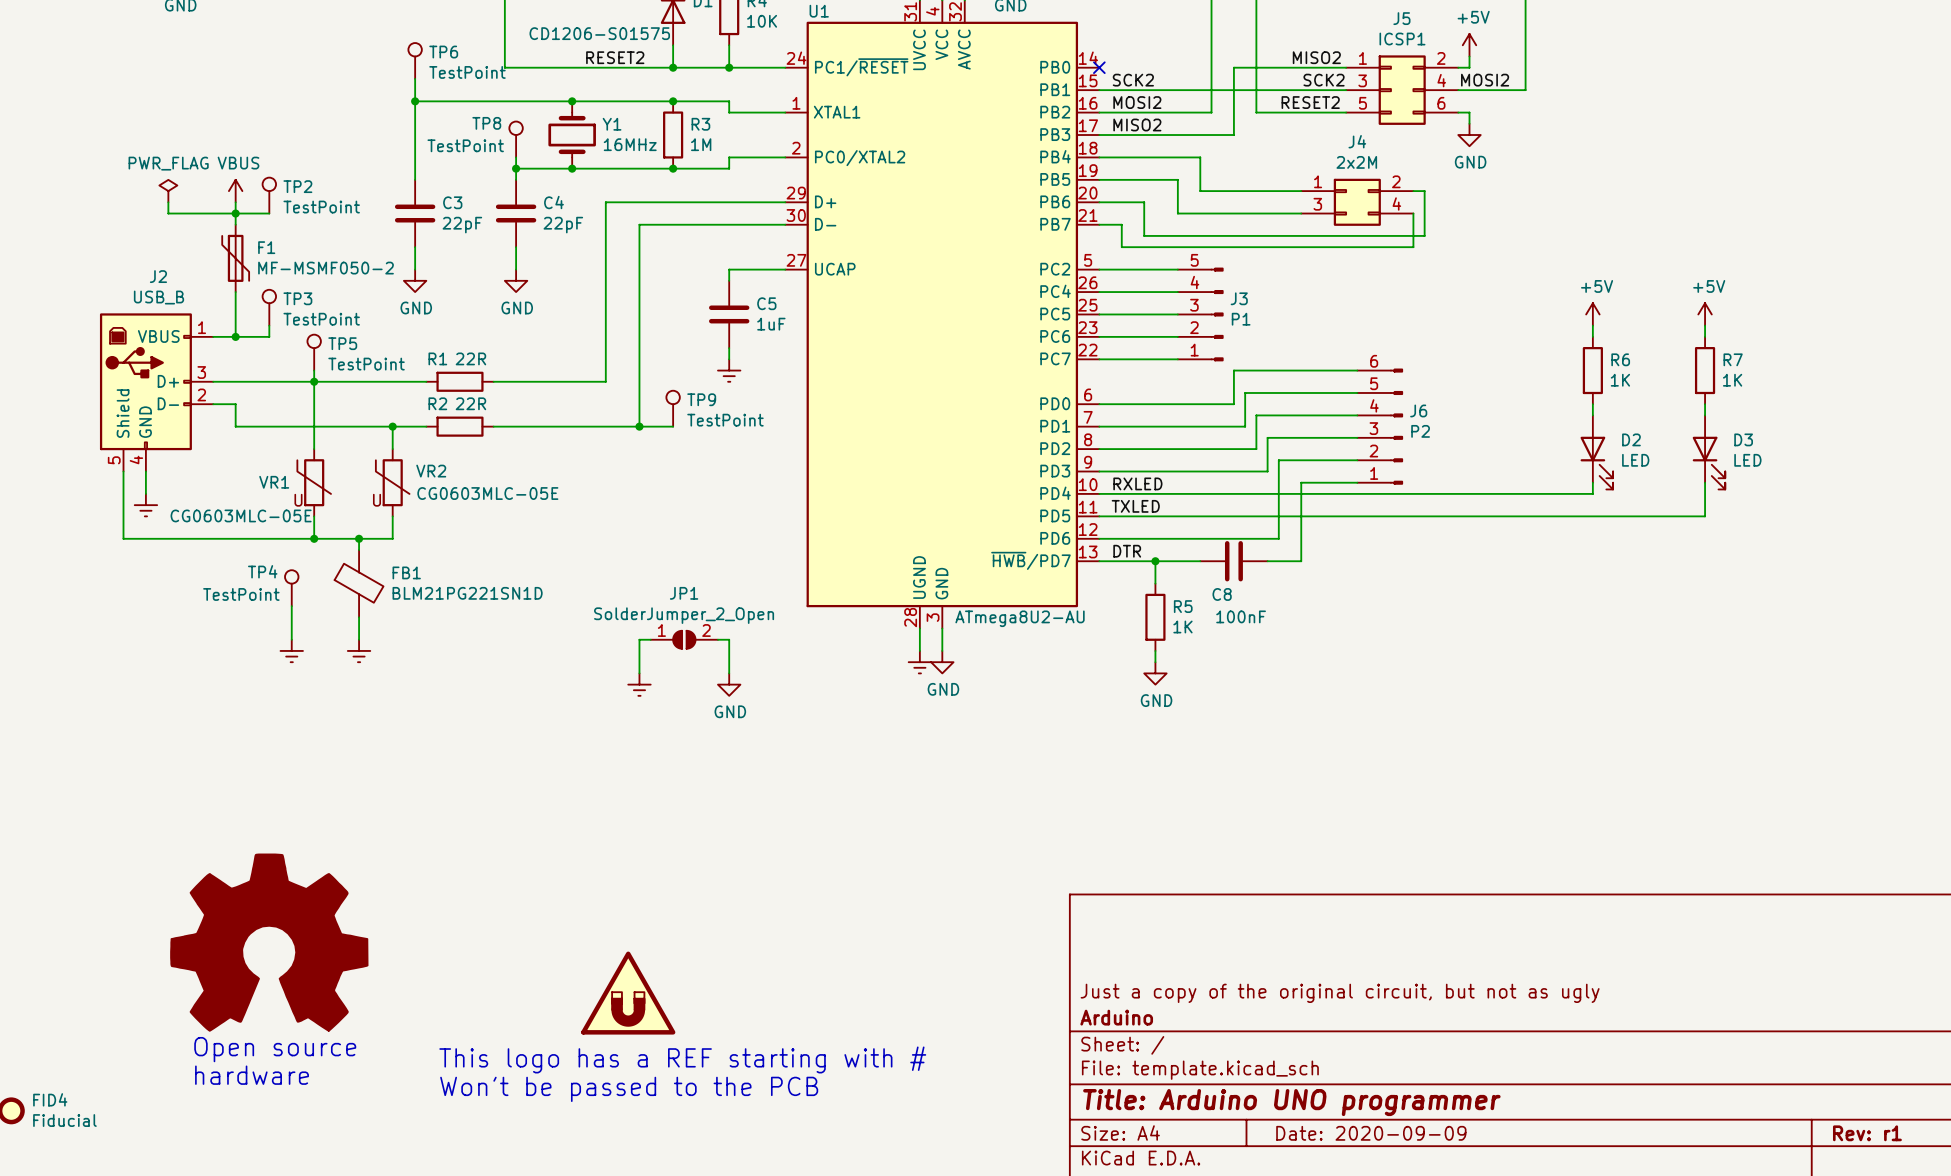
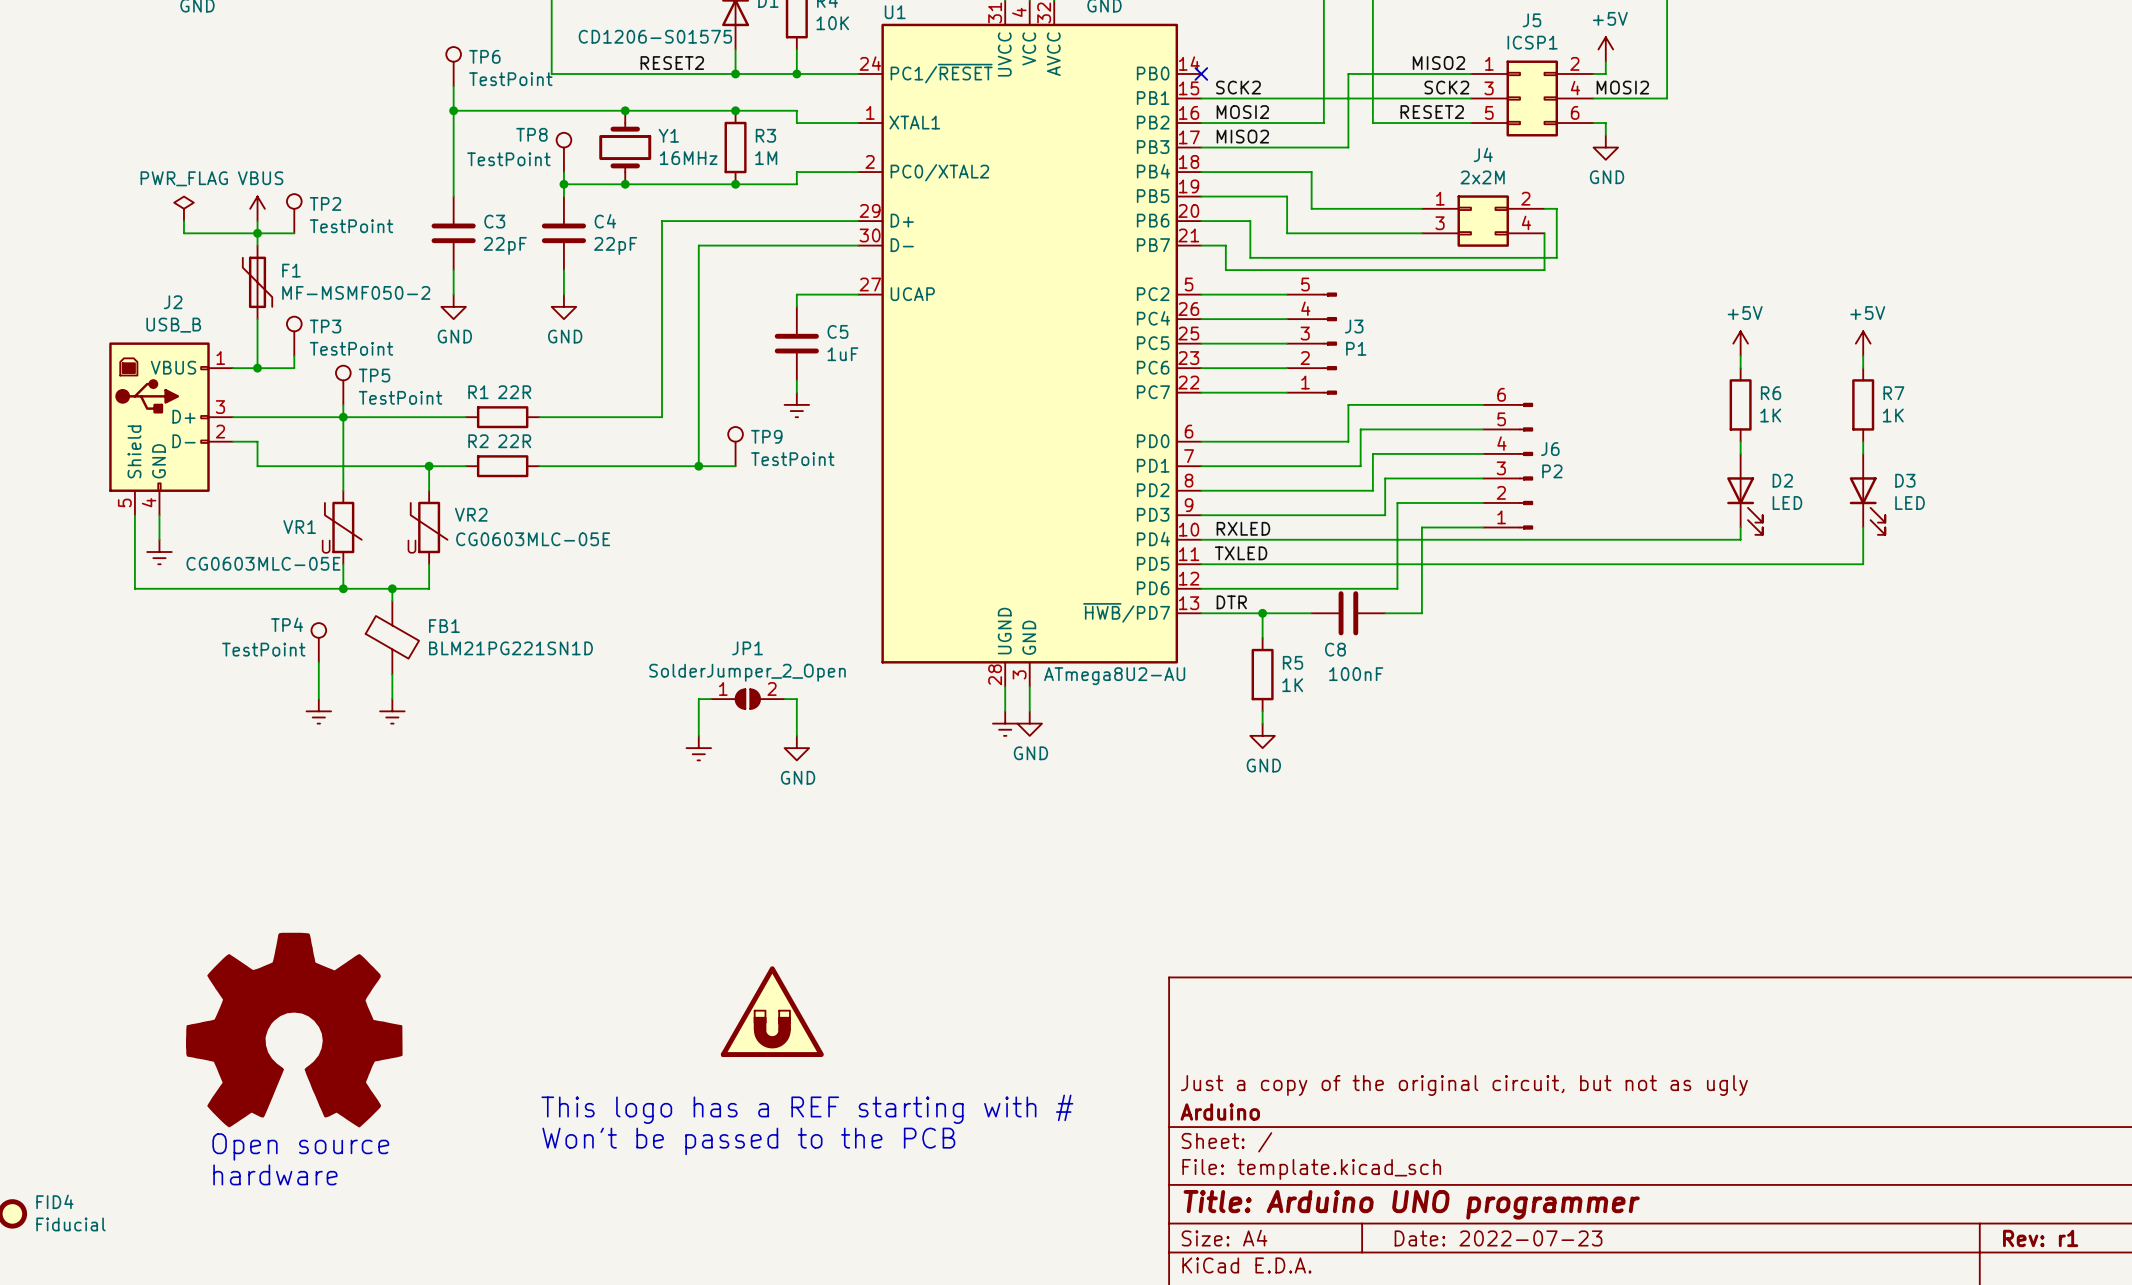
power symbol position: (628, 993) -> (772, 1011)
text position: This logo has a REF starting with # (682, 1059) -> This logo has a REF starting with # (807, 1109)
text position: Won't be passed to the PCB (629, 1089) -> Won't be passed to the PCB (748, 1141)
title block: Date: 2020-09-09 (1371, 1133) -> Date: 2022-07-23 (1498, 1238)

